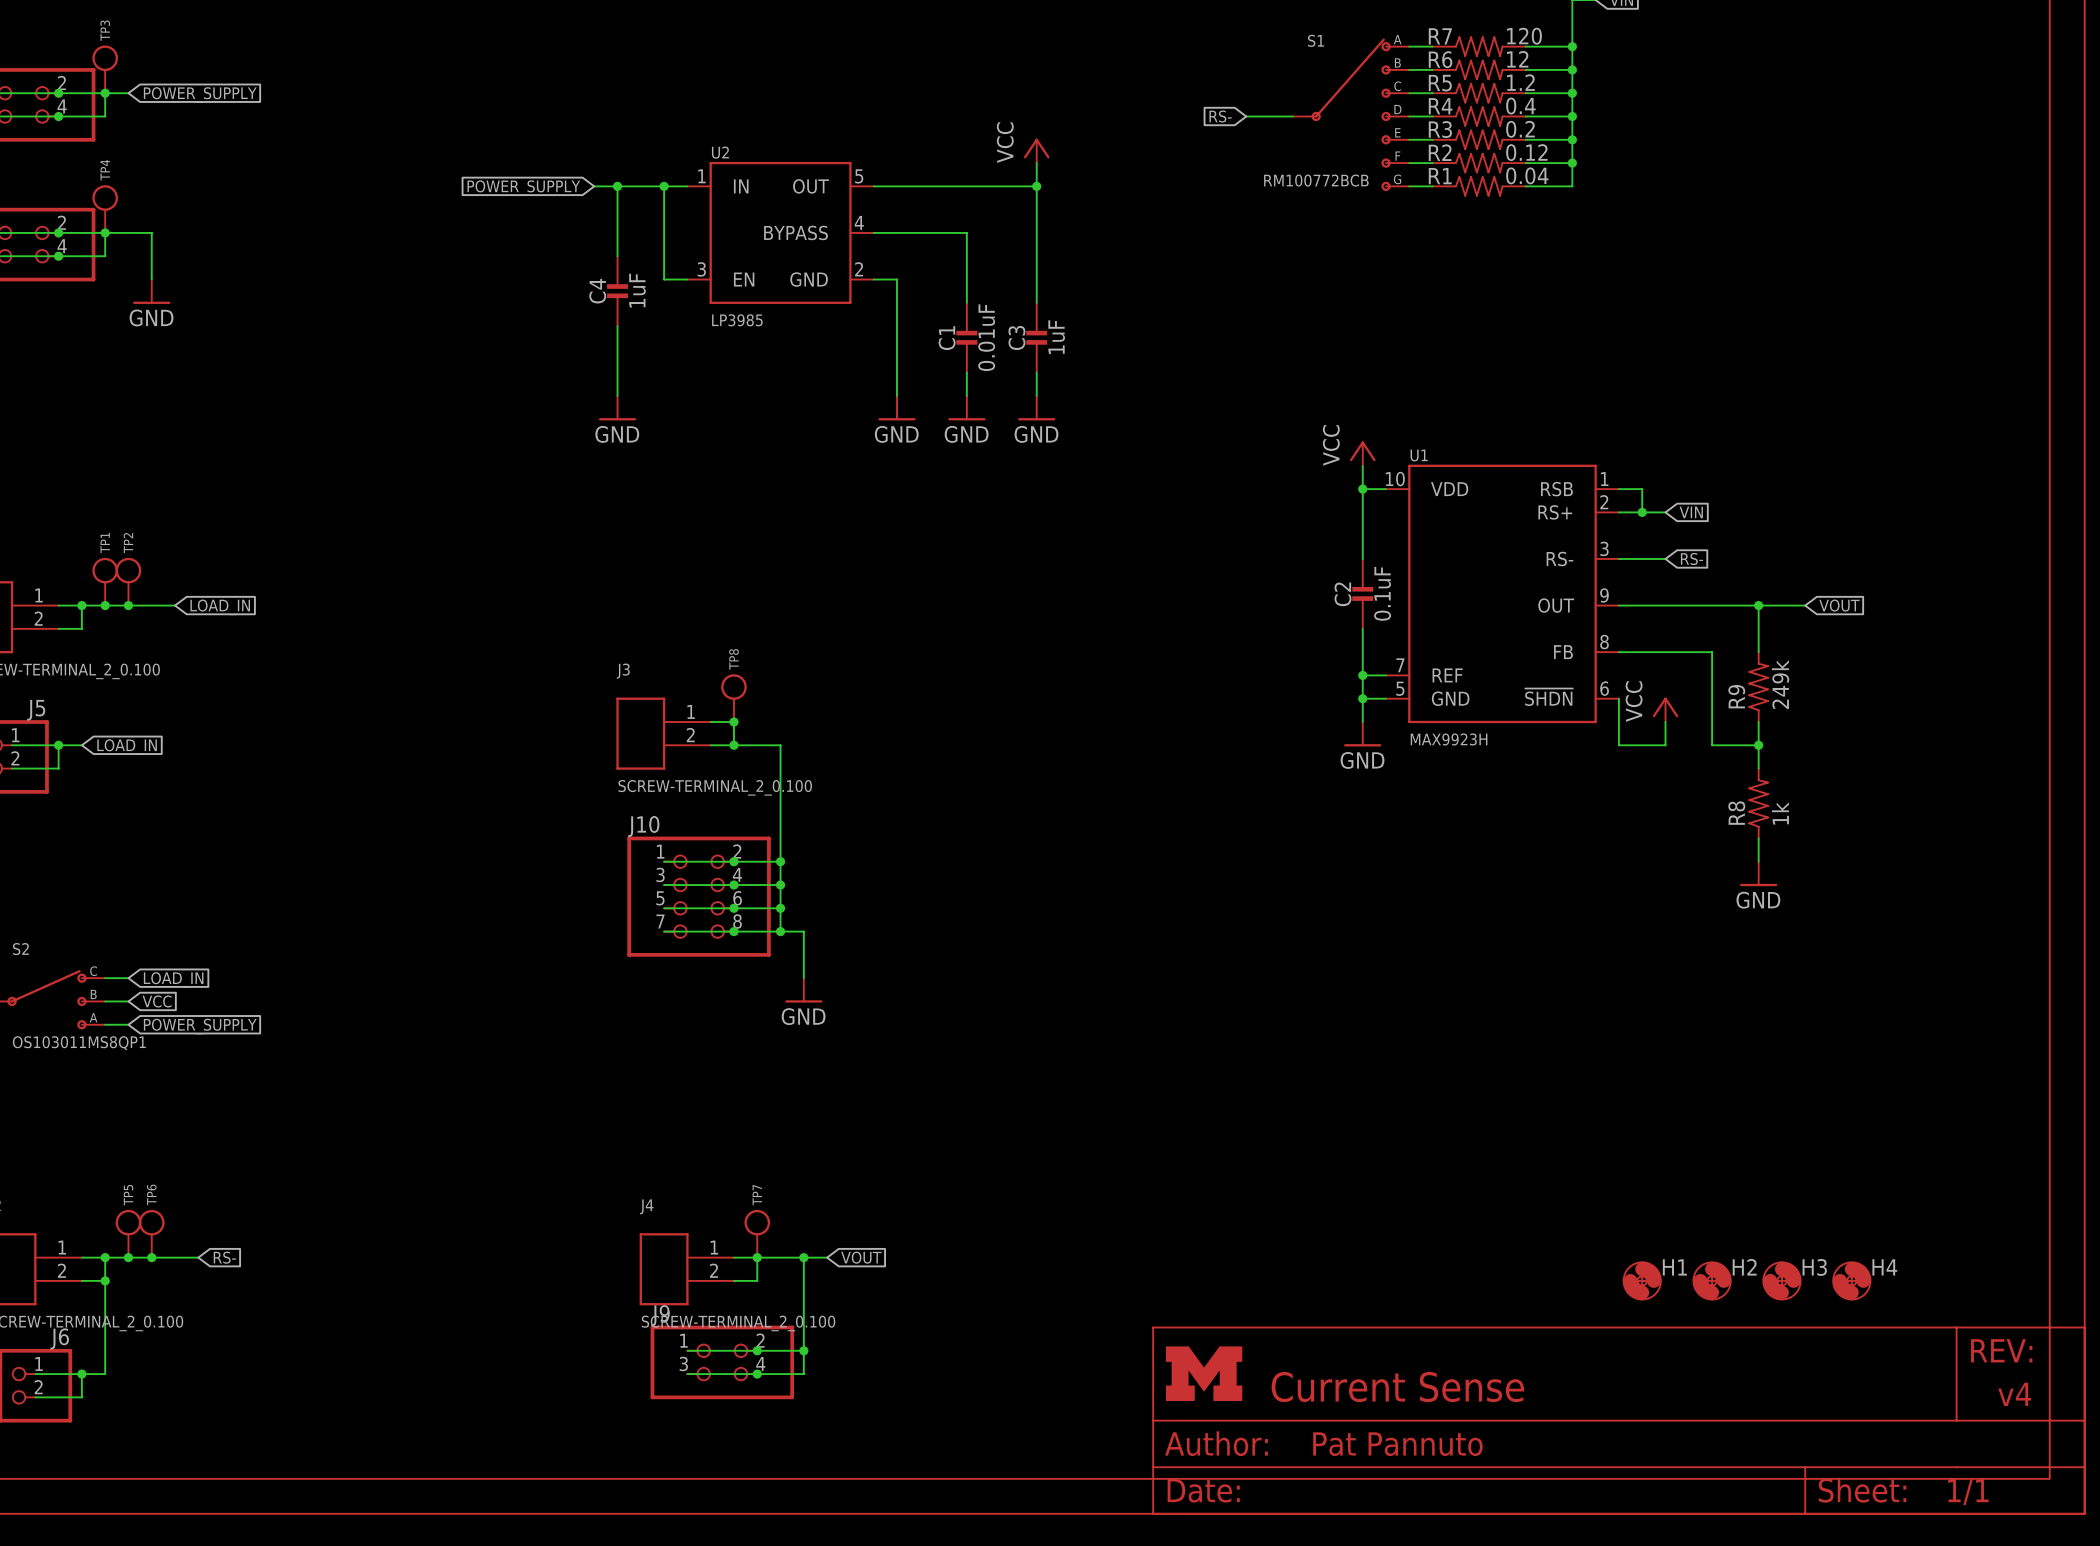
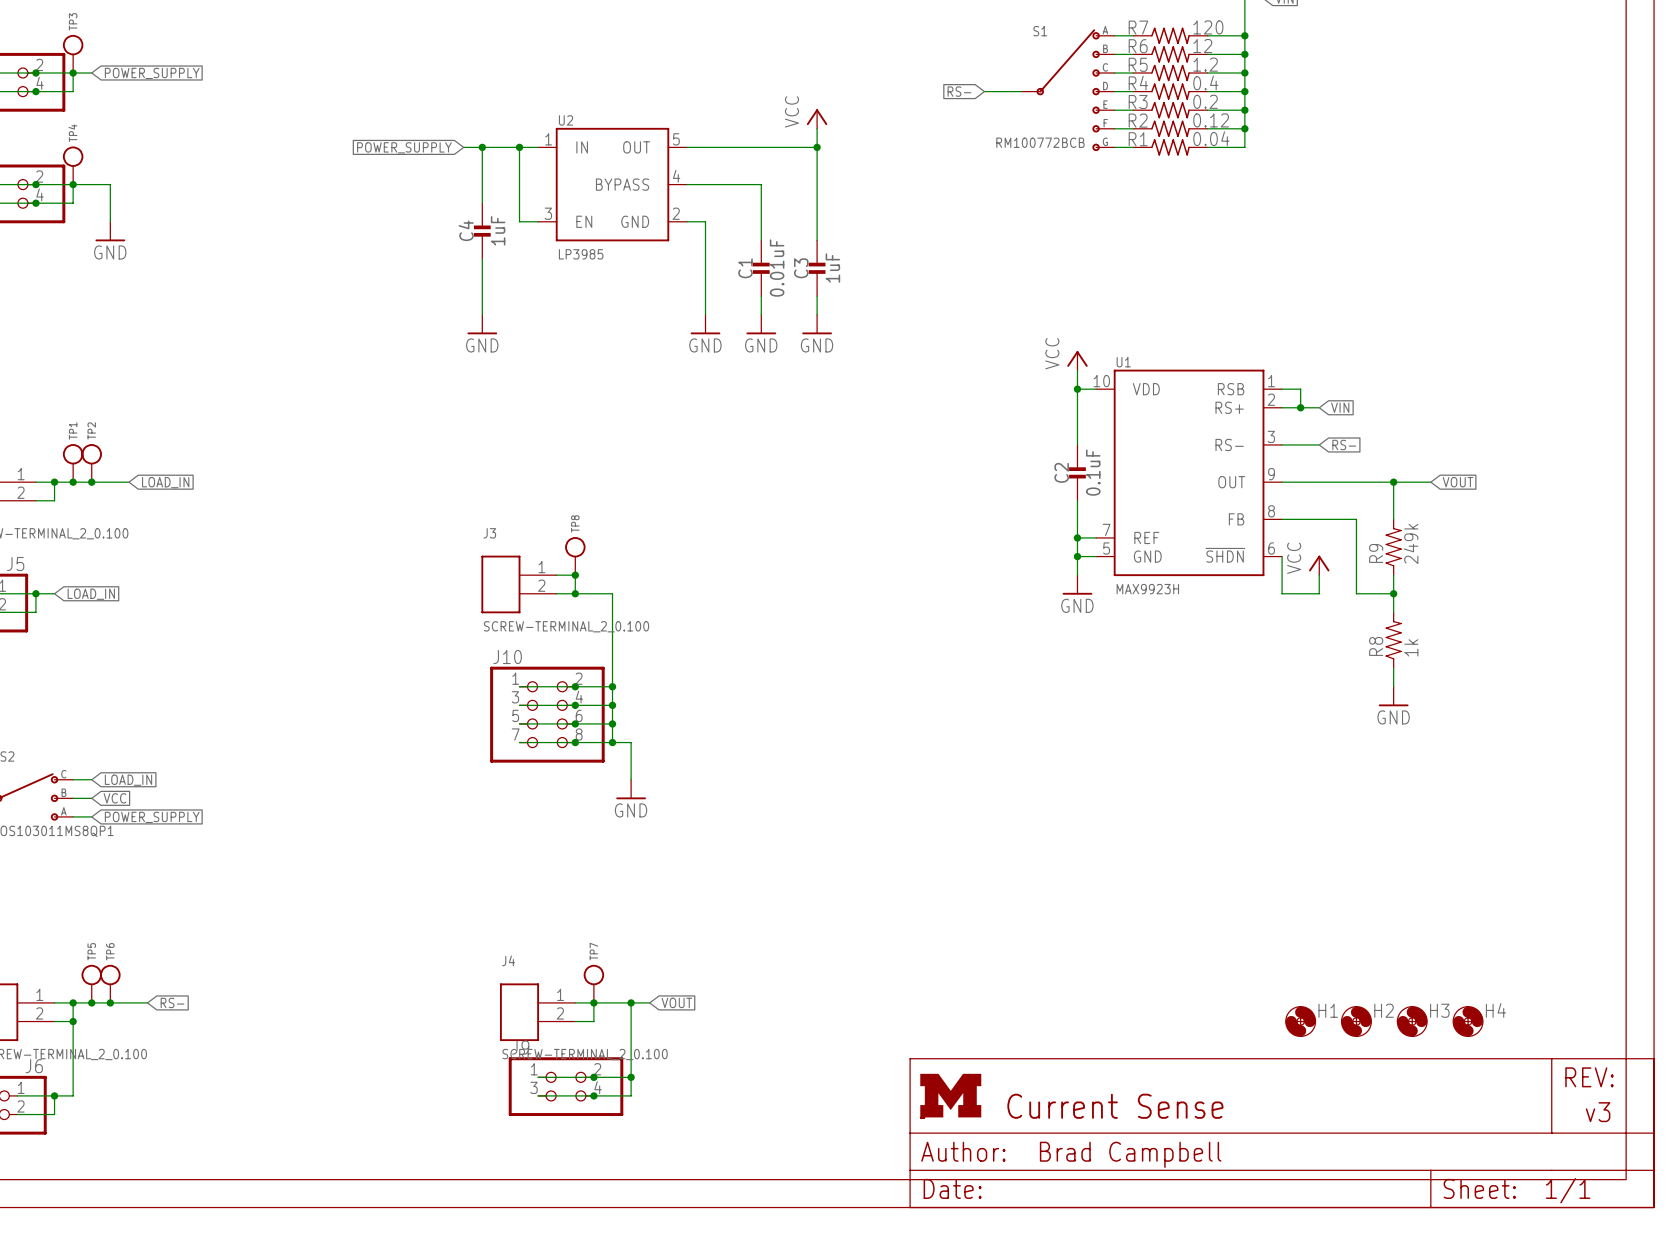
part text: v4 (2014, 1394) -> v3 (1598, 1112)
part text: Pat Pannuto (1397, 1444) -> Brad Campbell (1130, 1154)

